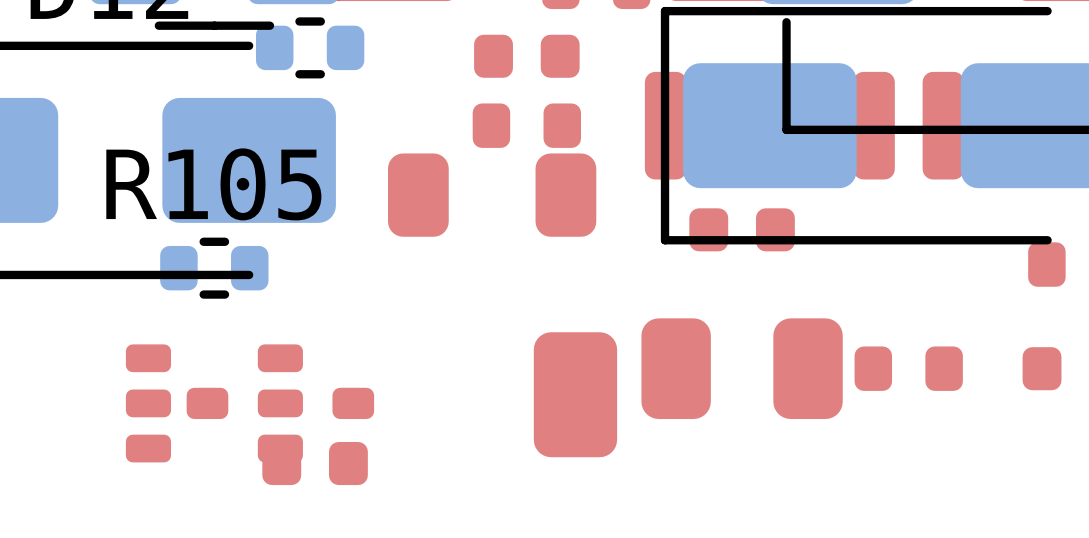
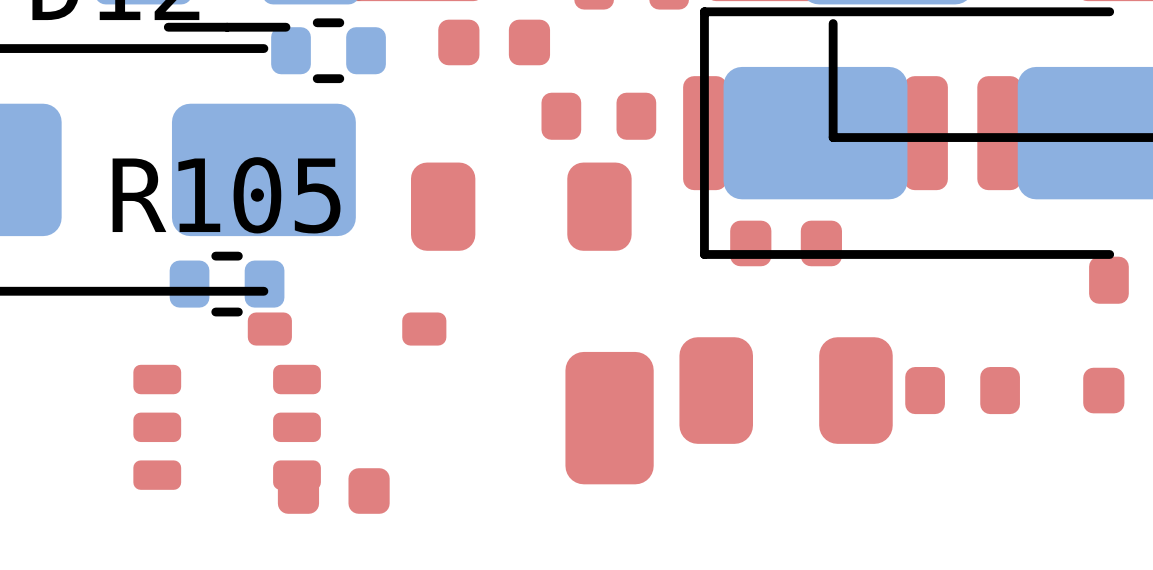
part position: (526, 56) -> (494, 42)
part position: (526, 125) -> (598, 116)
part position: (280, 403) -> (347, 329)

